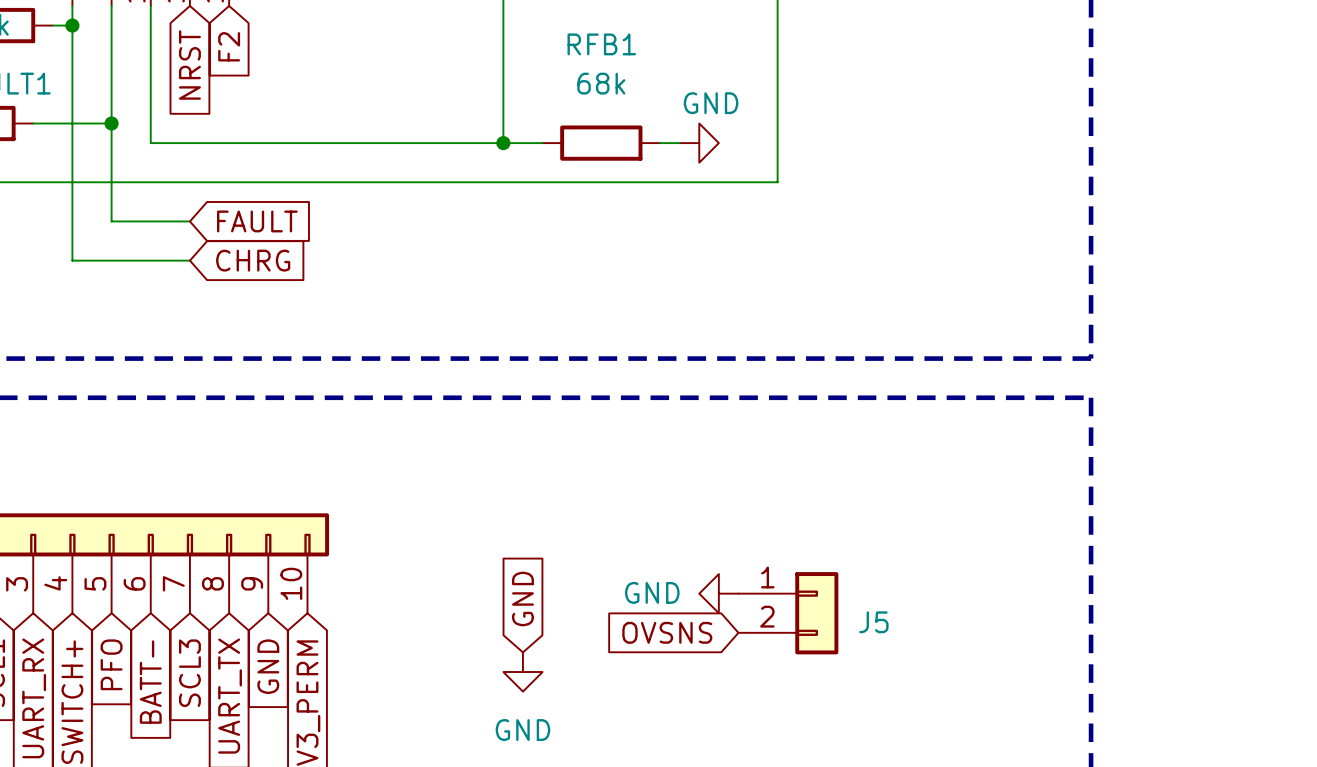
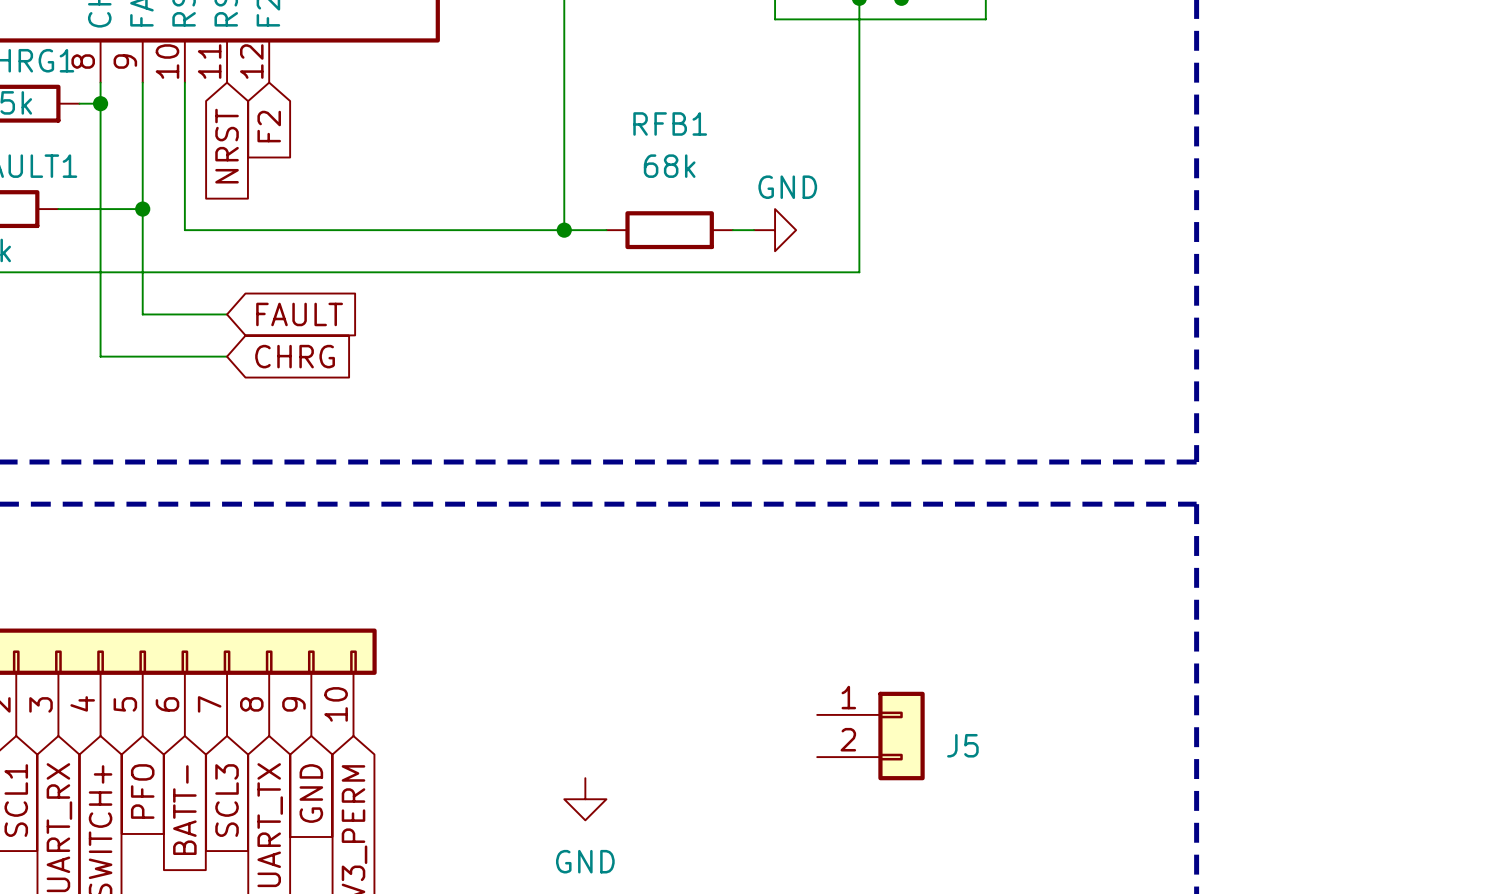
power symbol: GND (718, 593) -> none
global label: GND (522, 598) -> none
global label: OVSNS (667, 632) -> none

